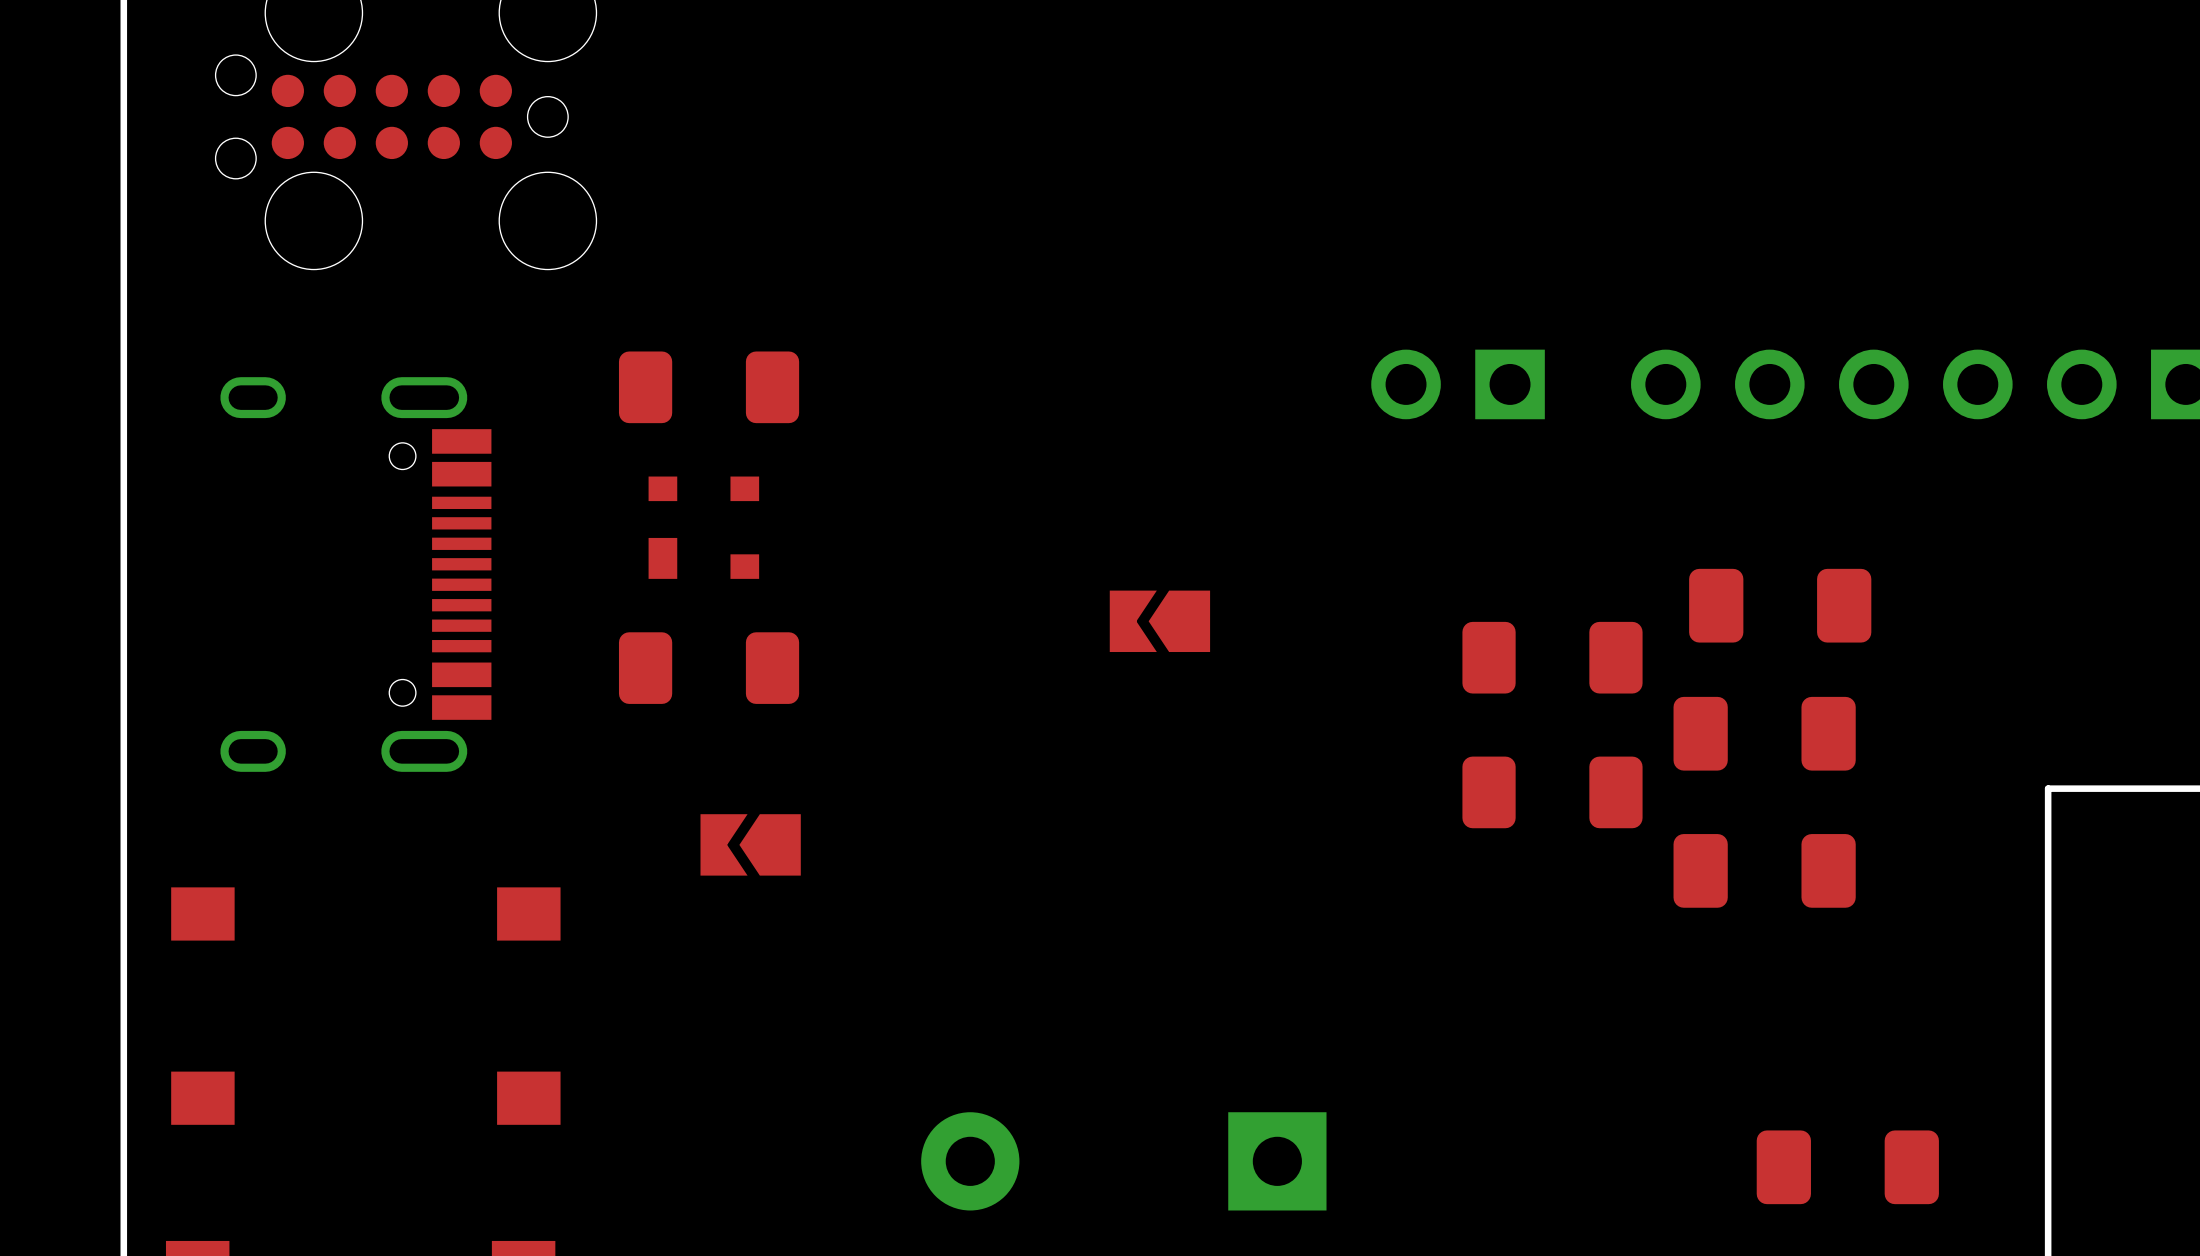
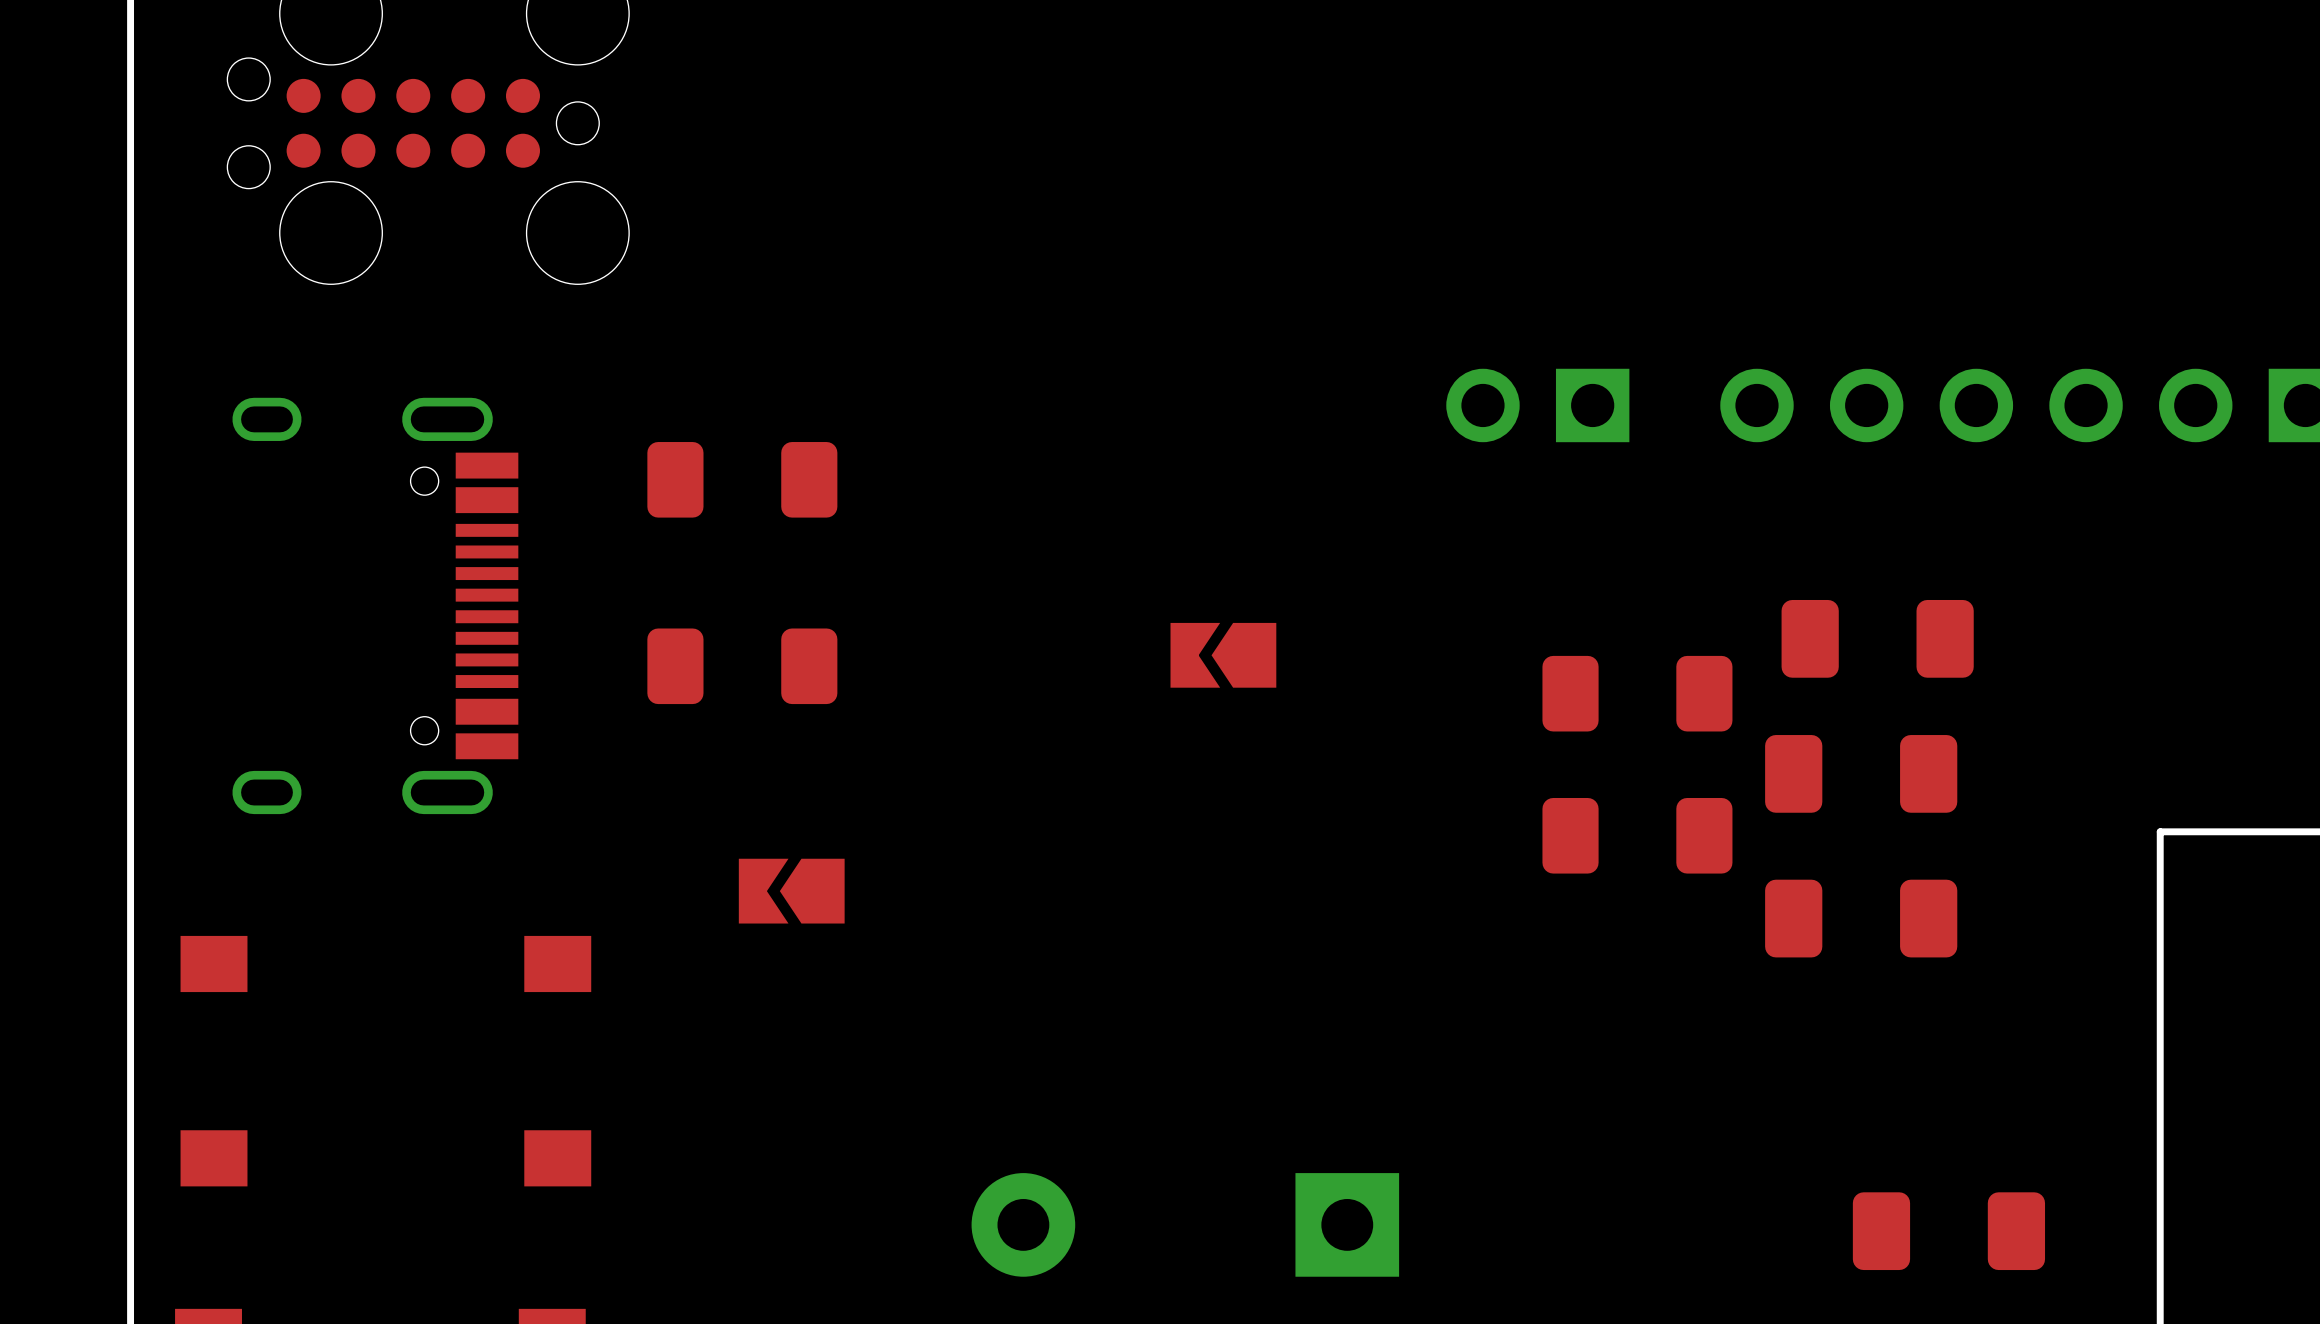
part position: (709, 387) -> (742, 479)
part: (703, 527) -> none
part position: (709, 668) -> (742, 666)

